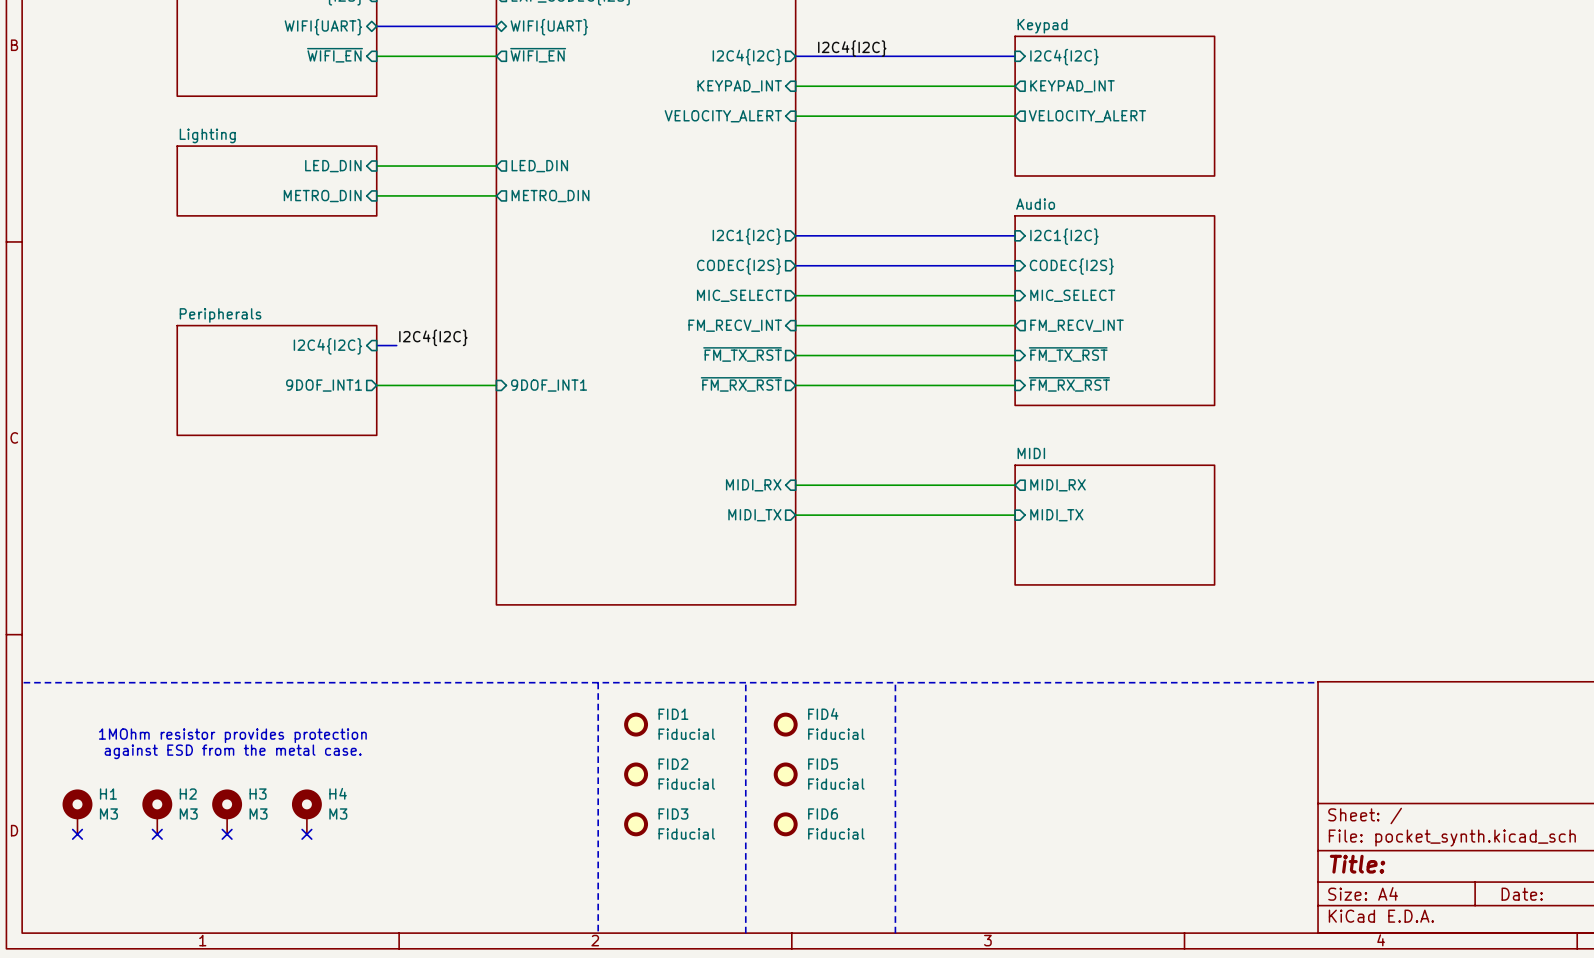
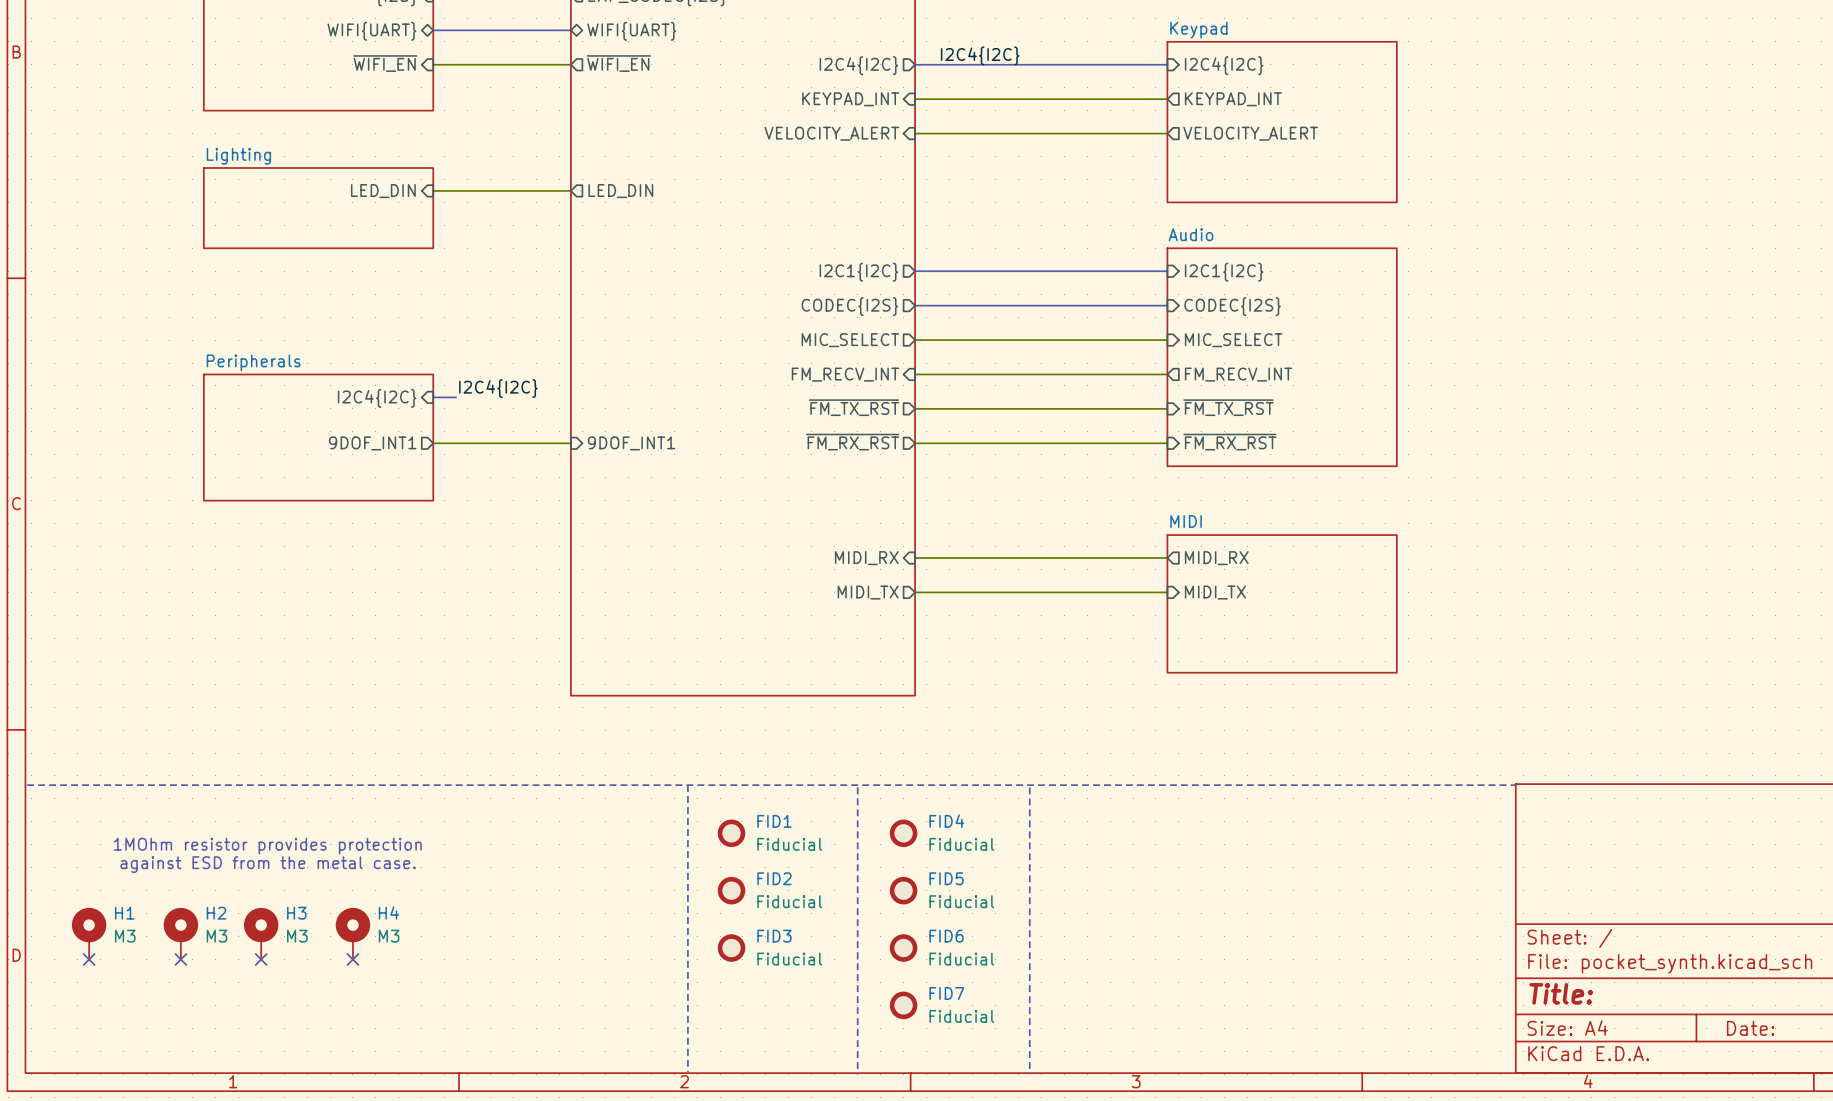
wire: (376, 195) (496, 195) -> none
sheet pin: METRO_DIN (322, 196) -> none
sheet pin: METRO_DIN (550, 196) -> none
FID7: none -> Fiducial (903, 1005)

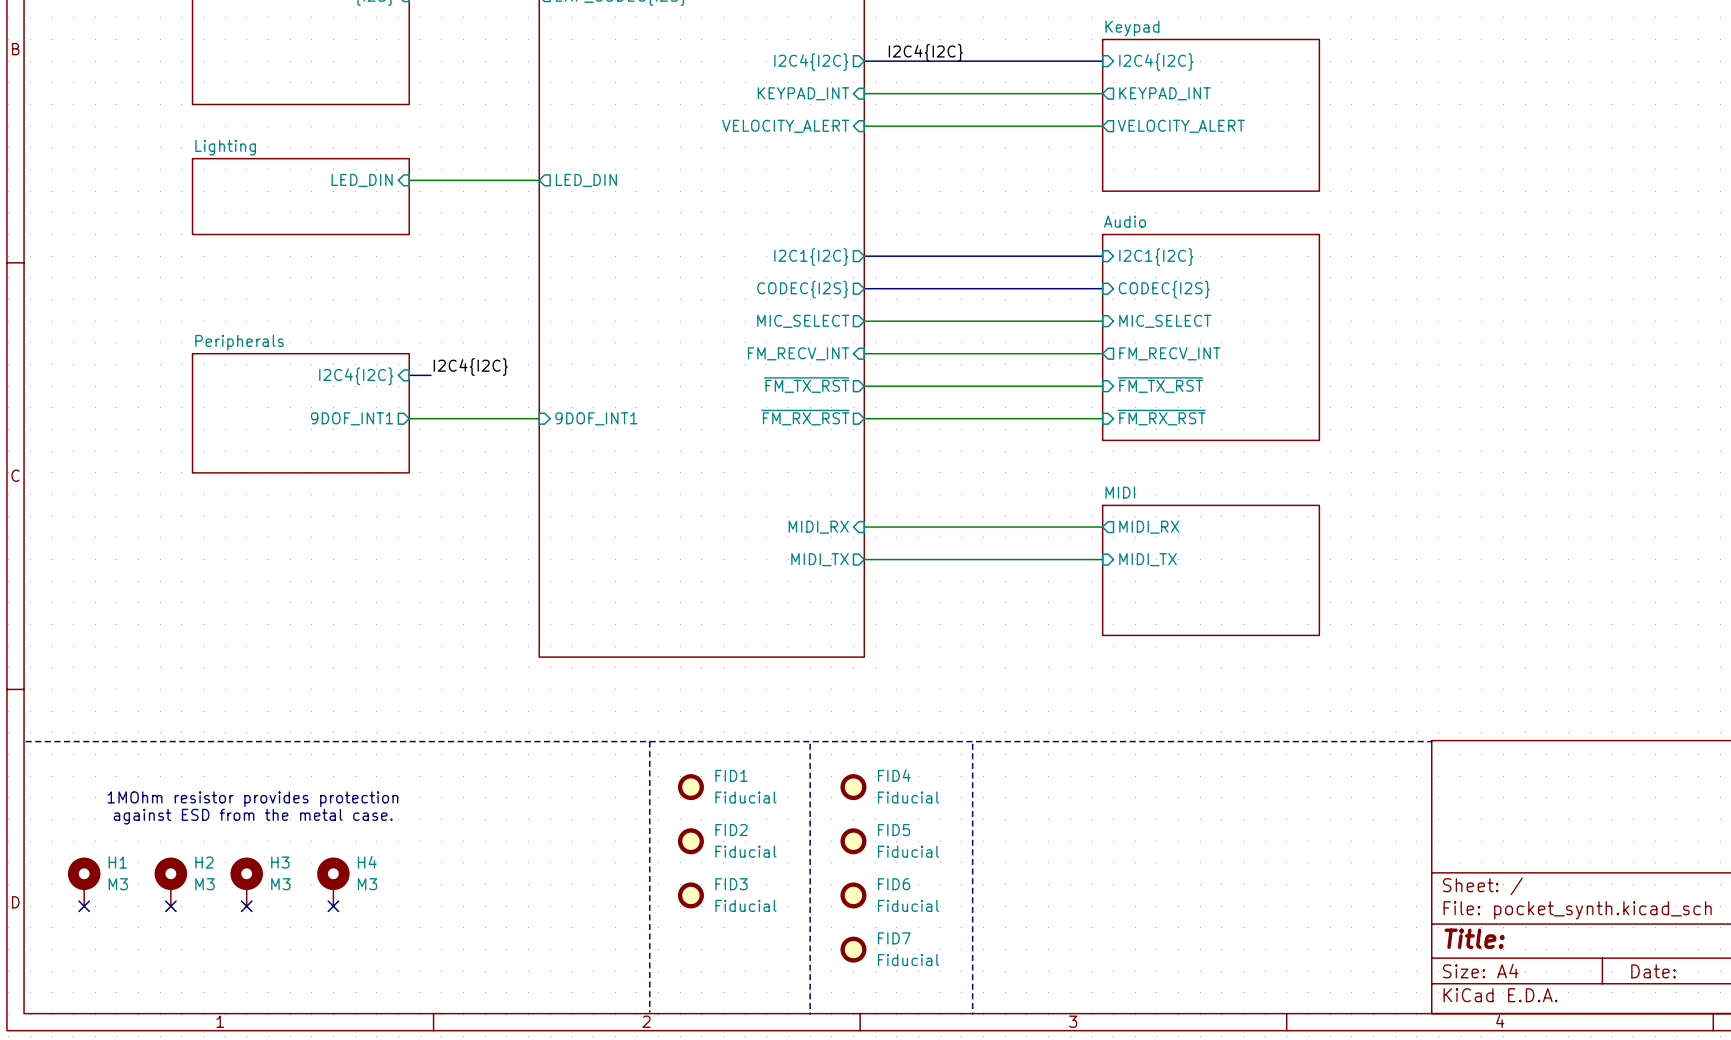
bus: (433, 30) (570, 30) -> none
sheet pin: WIFI{UART} (371, 31) -> none
sheet pin: WIFI{UART} (631, 31) -> none
sheet pin: ~{WIFI_EN} (385, 63) -> none
sheet pin: ~{WIFI_EN} (618, 63) -> none
wire: (433, 64) (570, 64) -> none

